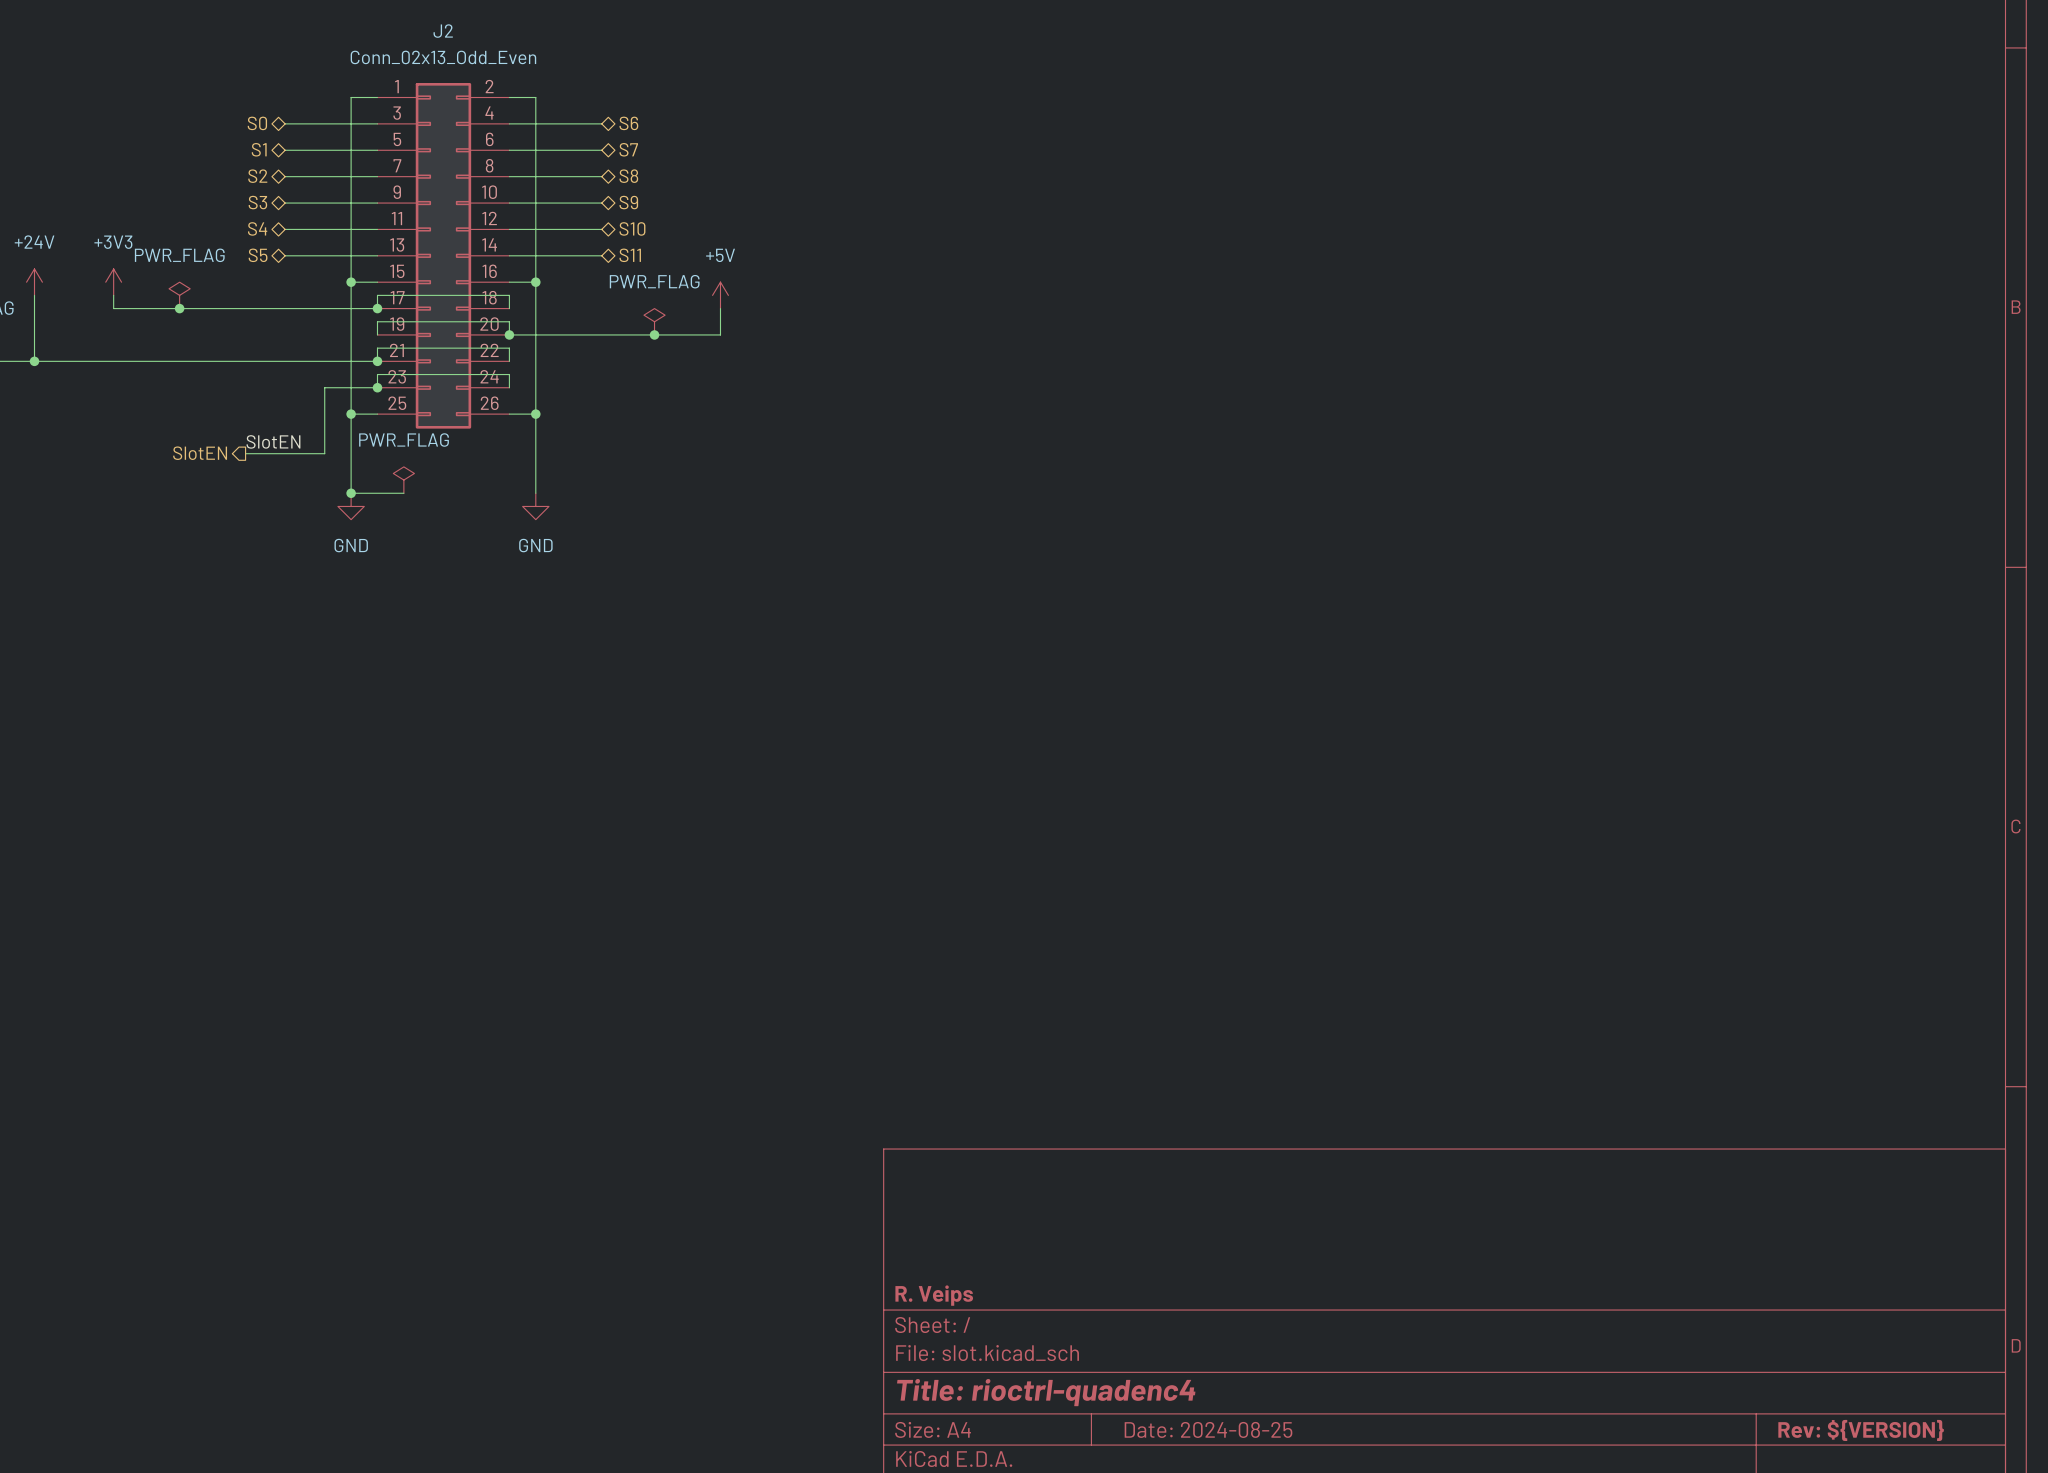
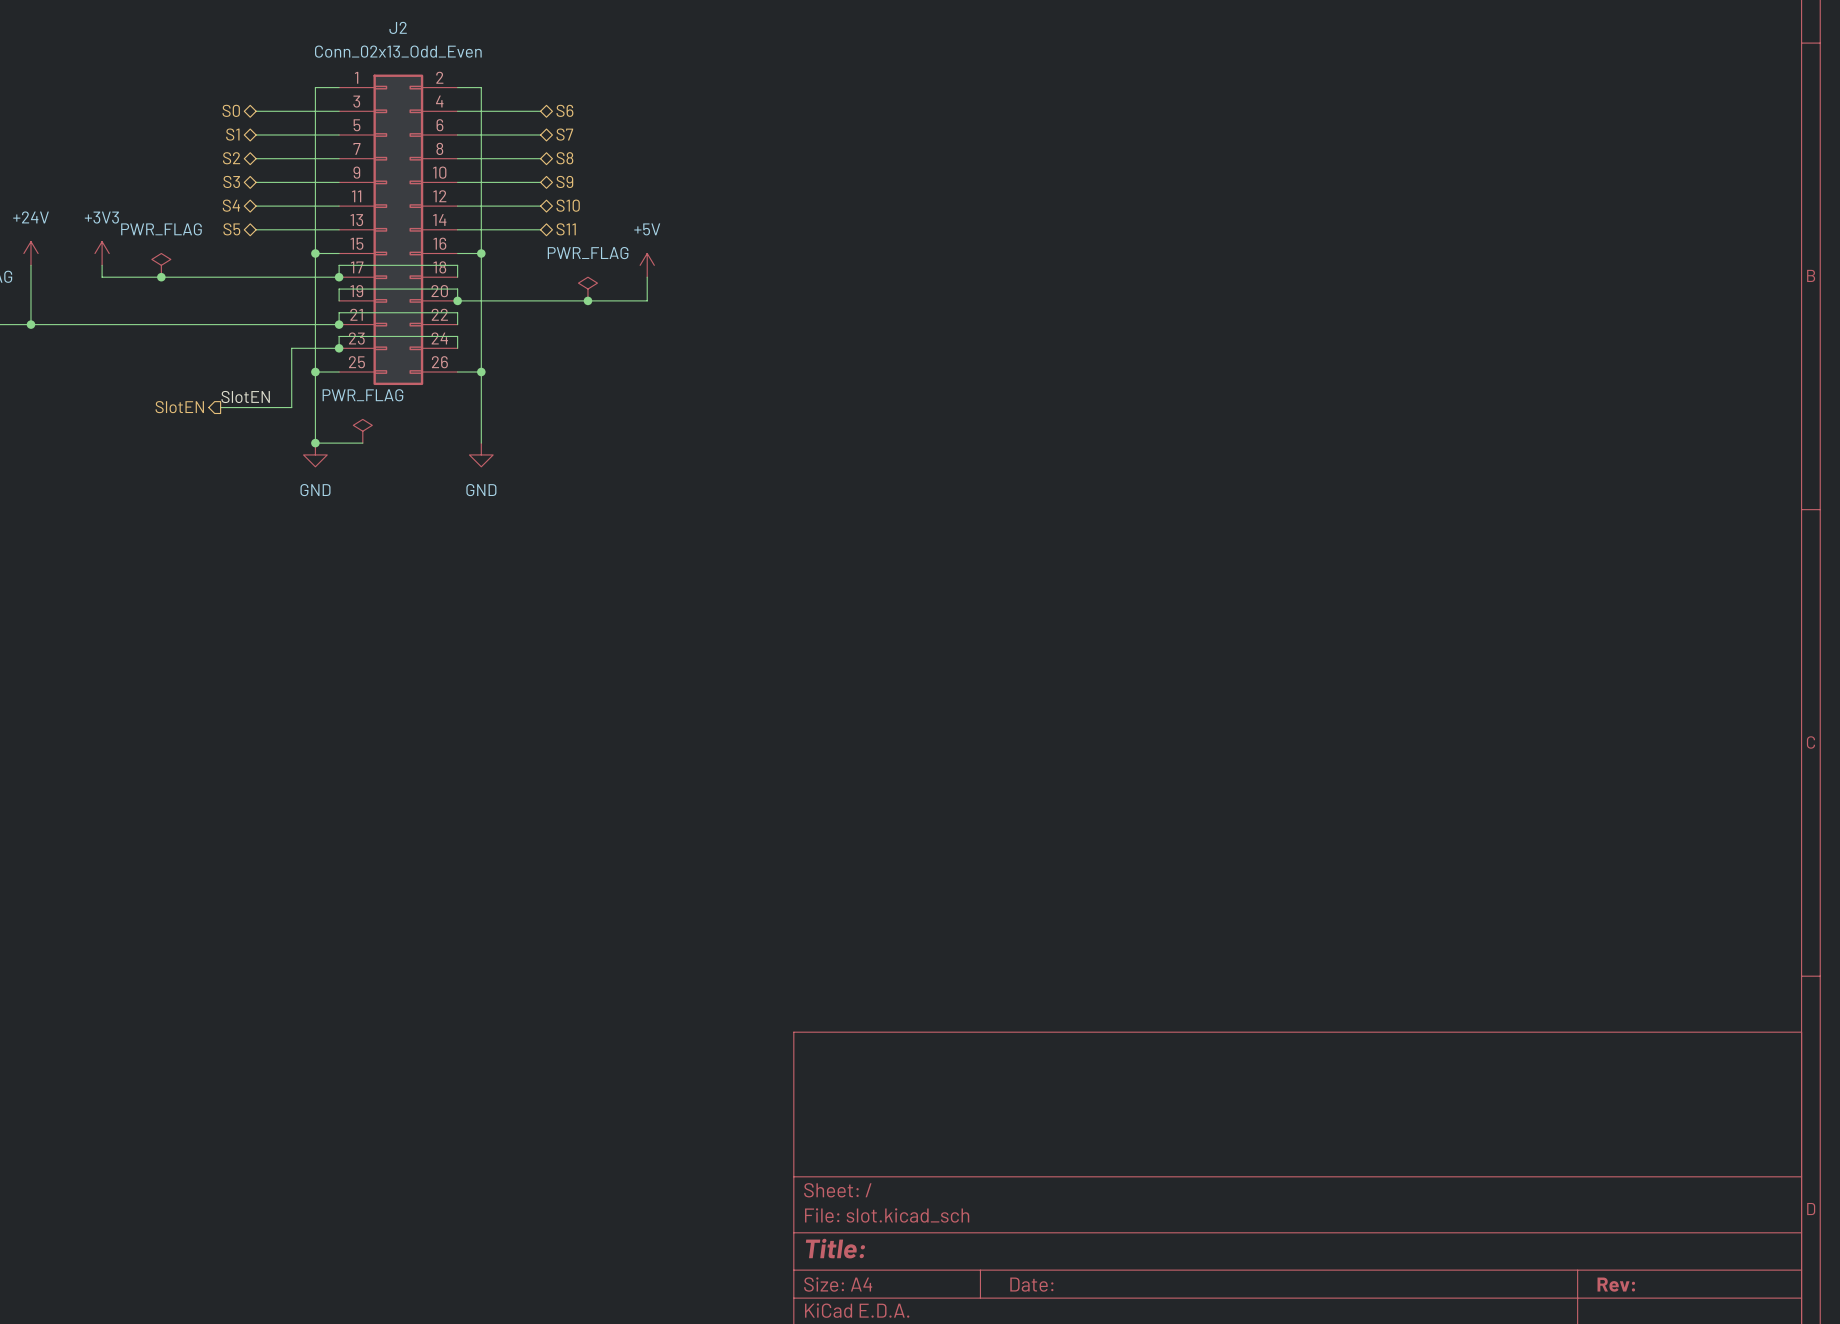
title block: R. Veips (934, 1295) -> none
title block: Title: rioctrl-quadenc4 (1046, 1392) -> Title: (835, 1248)
title block: Date: 2024-08-25 (1208, 1429) -> Date: (1031, 1284)
title block: Rev: ${VERSION} (1861, 1430) -> Rev: (1616, 1284)

